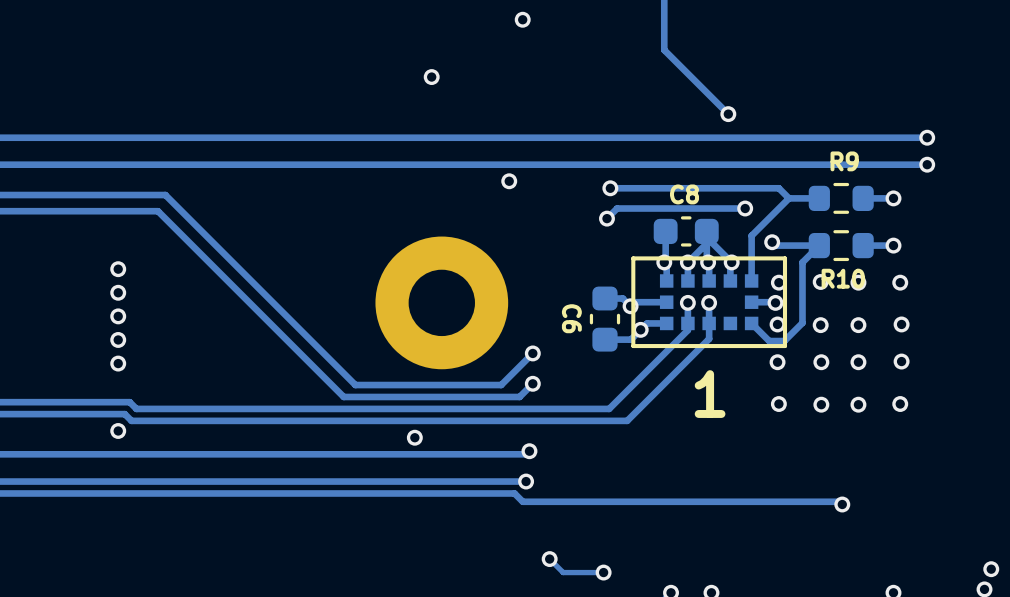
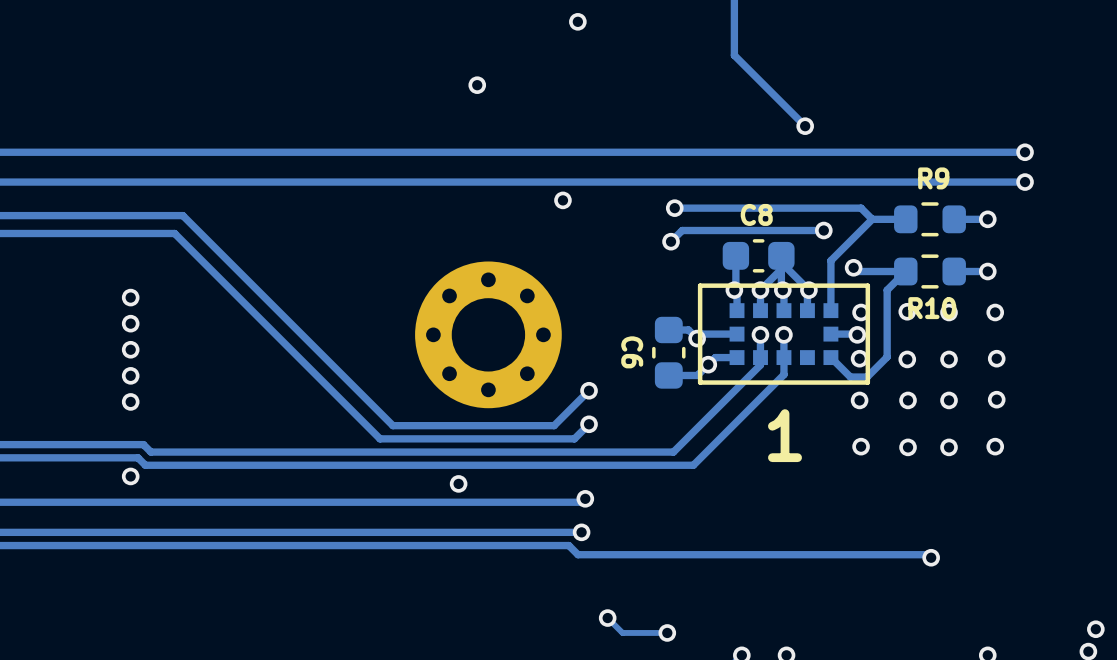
part footprint: [375, 236, 509, 370] -> [415, 261, 562, 409]

